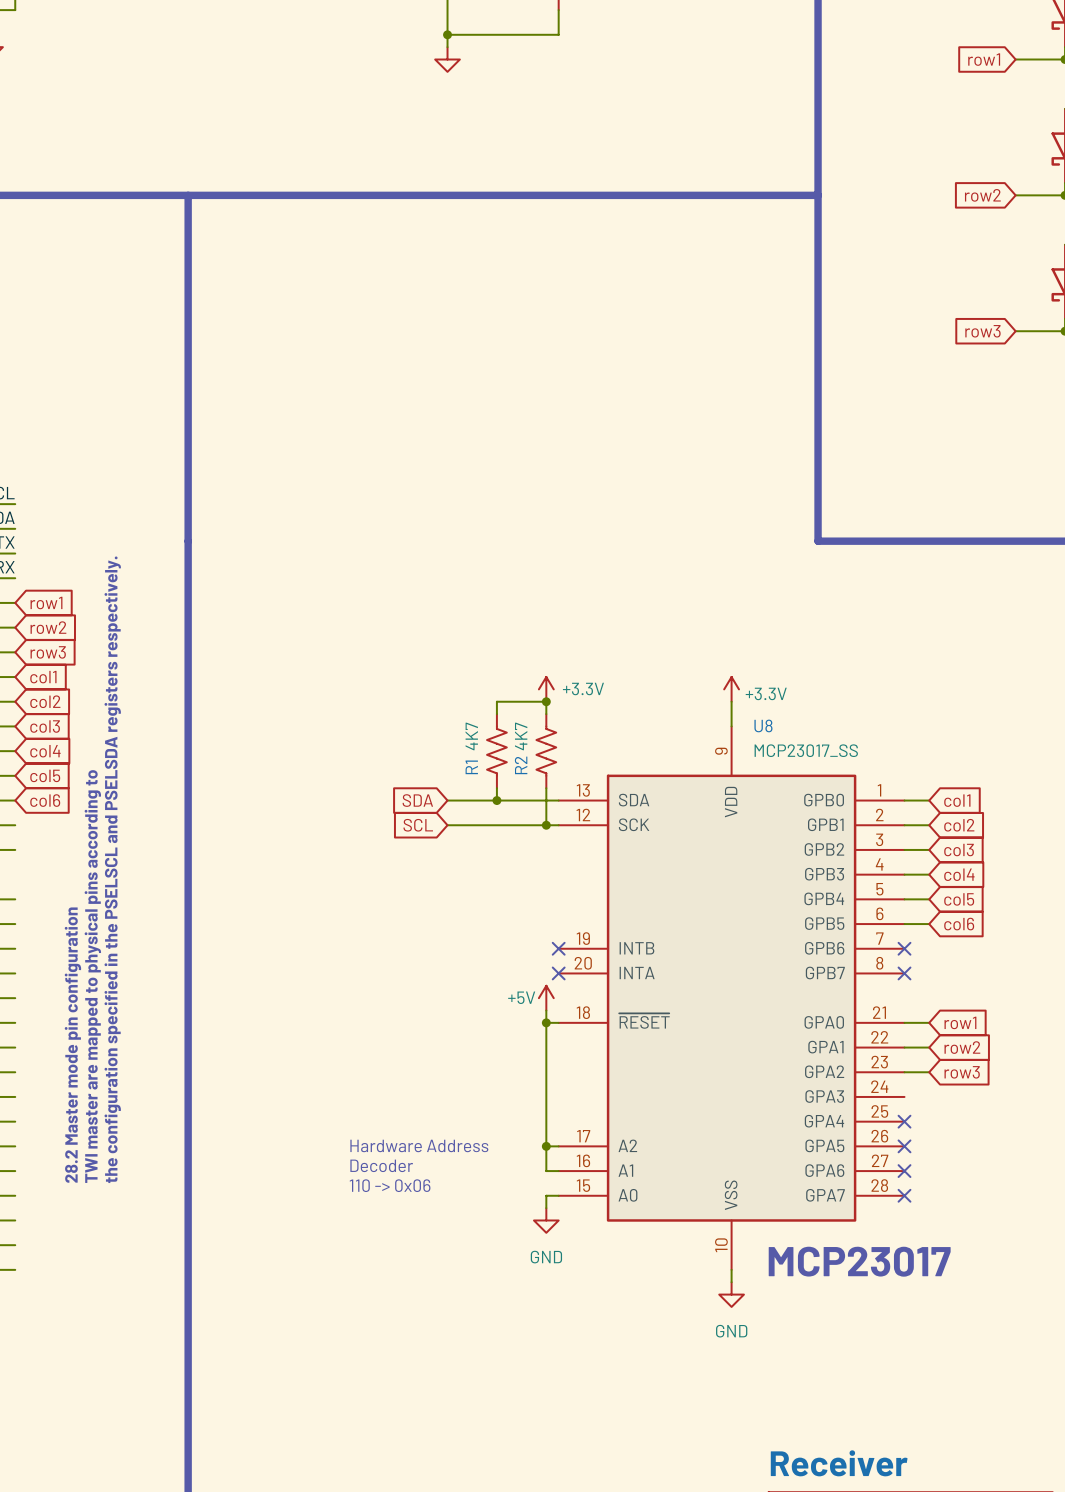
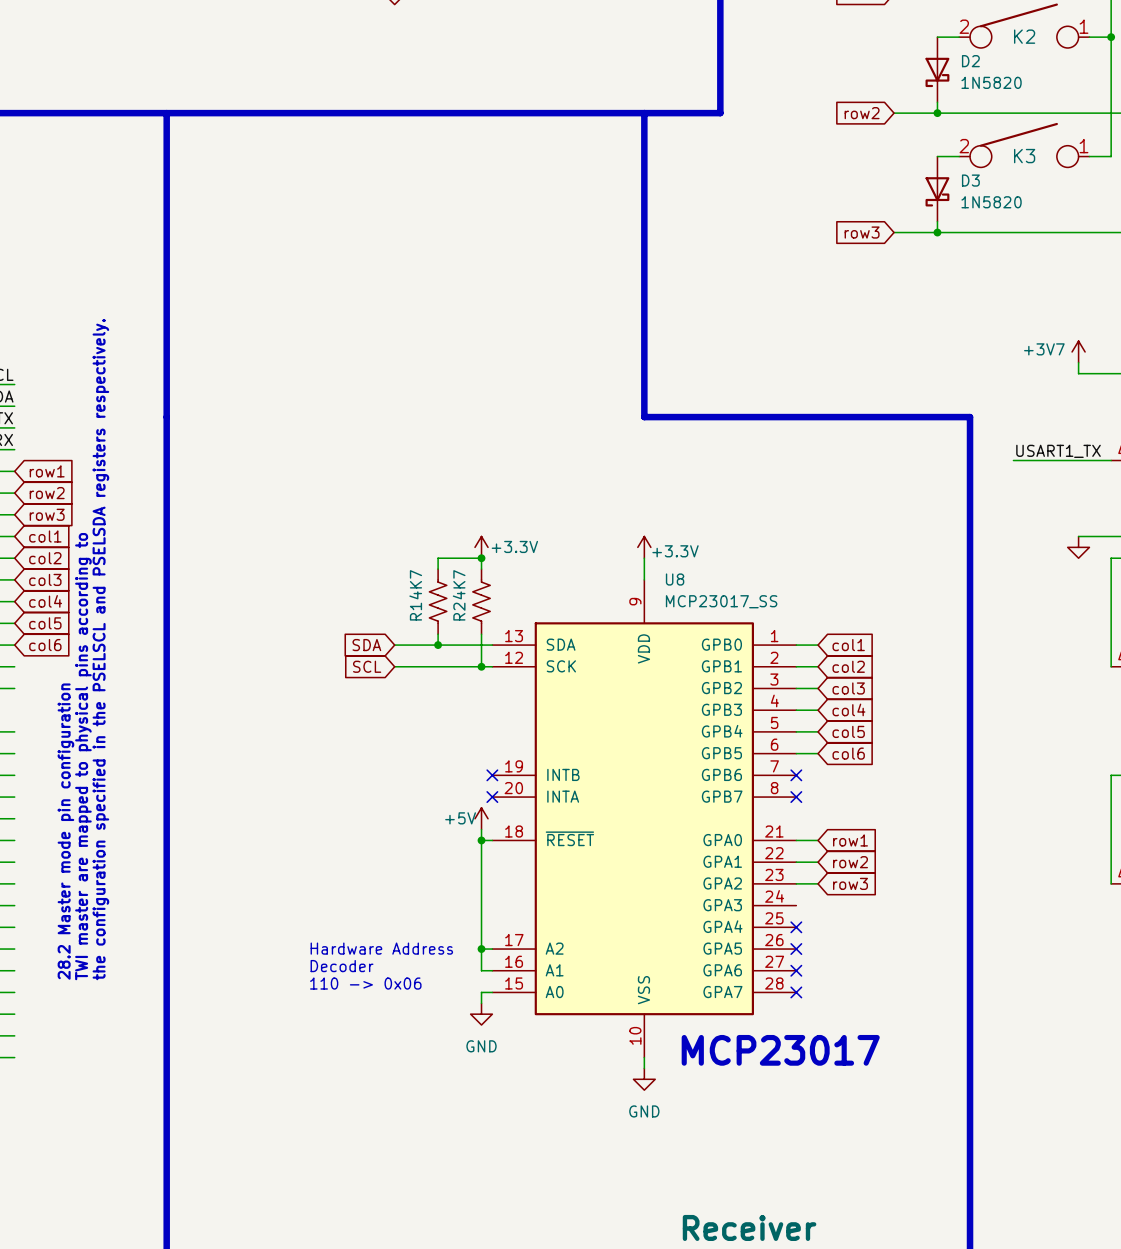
line: (818, 195) (818, 541) -> (644, 113) (644, 417) (720, 417)

